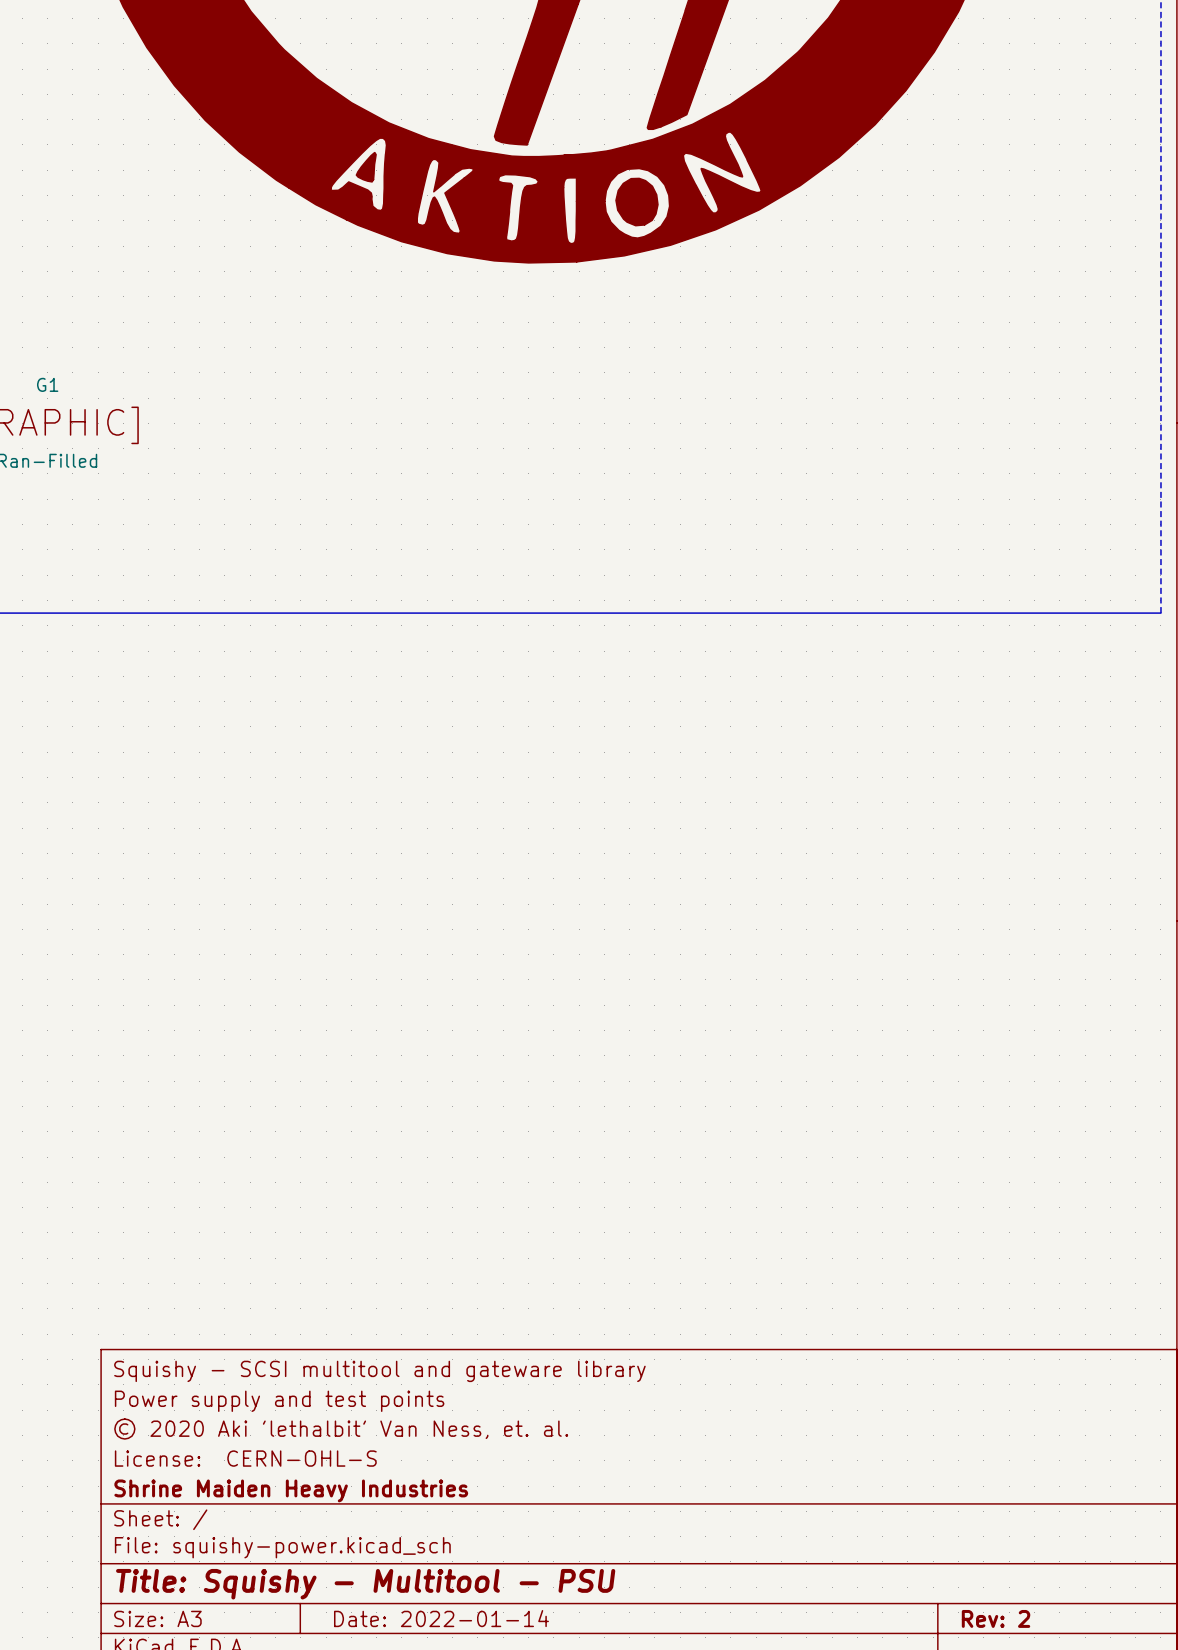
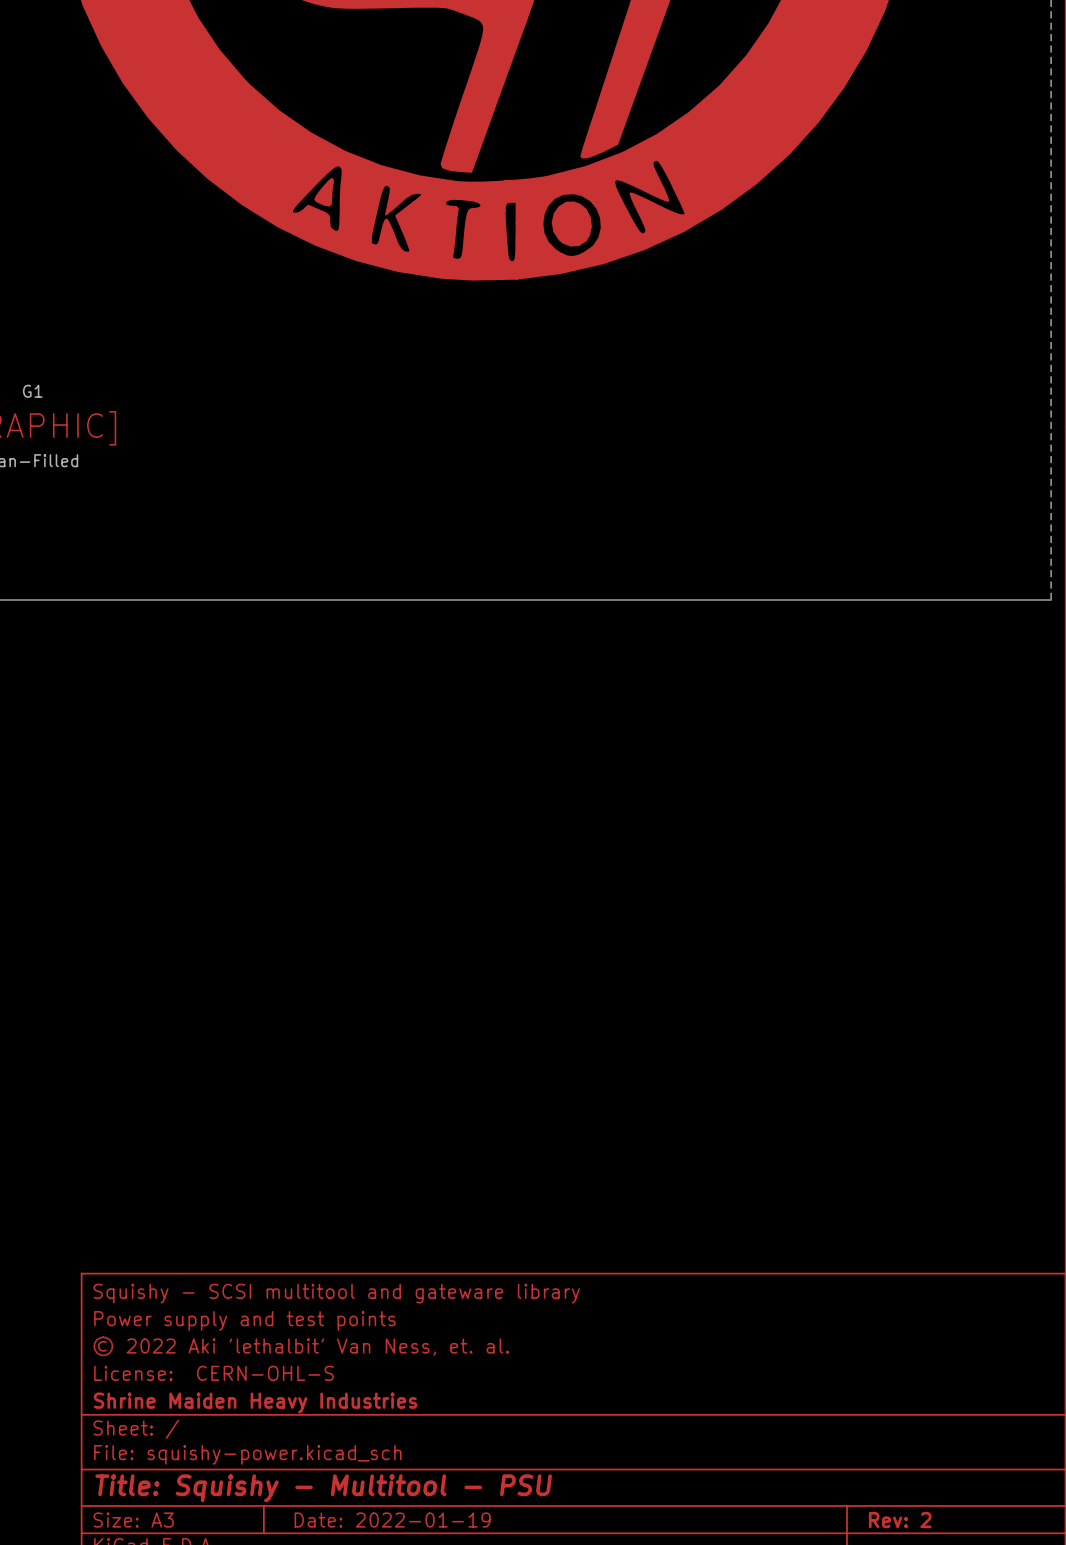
title block: © 2020 Aki 'lethalbit' Van Ness, et. al. (341, 1429) -> © 2022 Aki 'lethalbit' Van Ness, et. al. (301, 1346)
title block: Date: 2022-01-14 (441, 1618) -> Date: 2022-01-19 (392, 1520)

